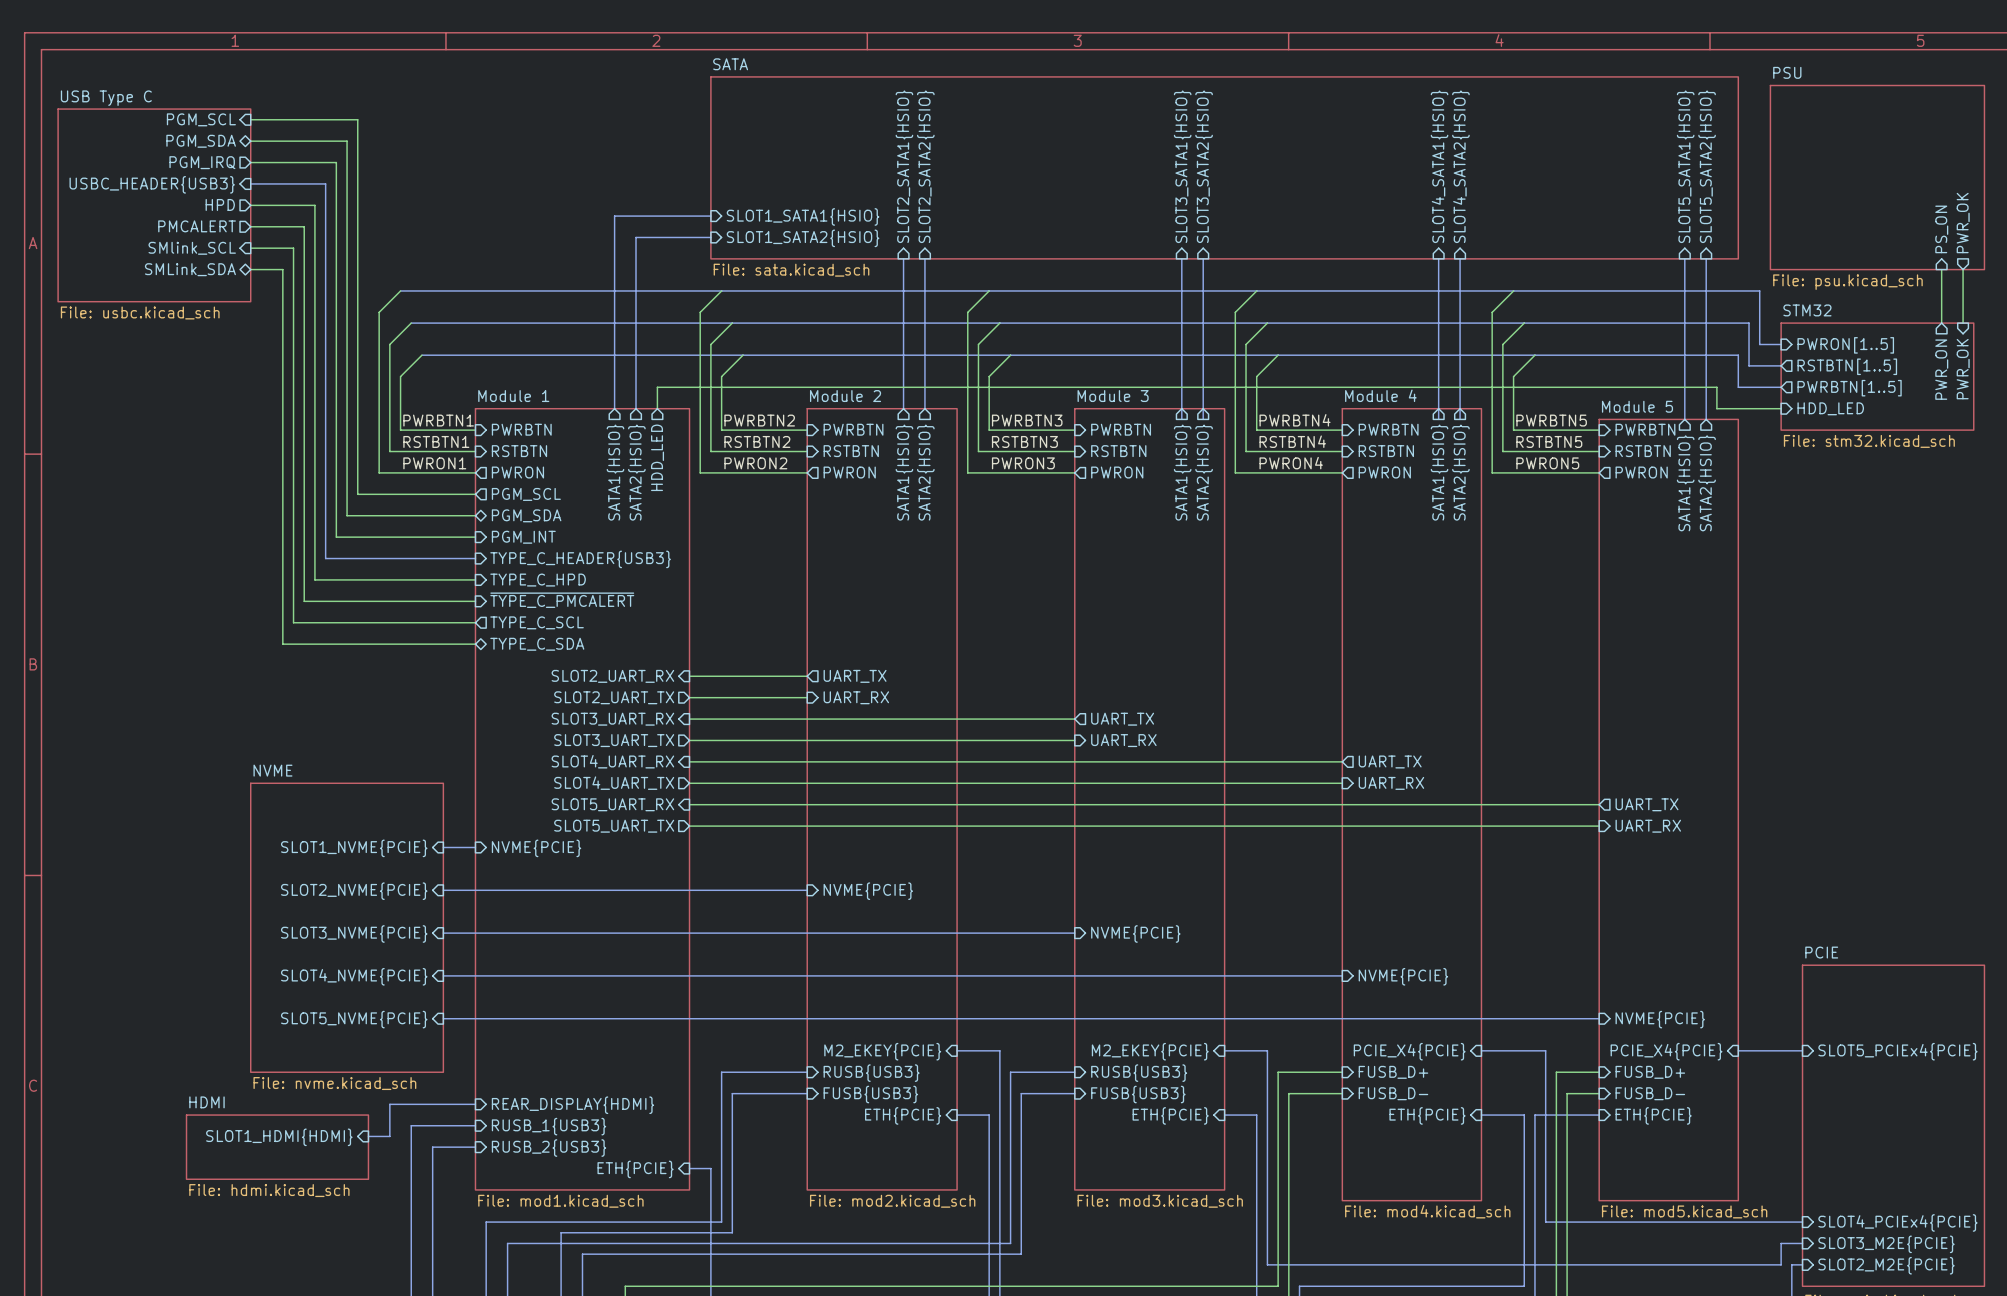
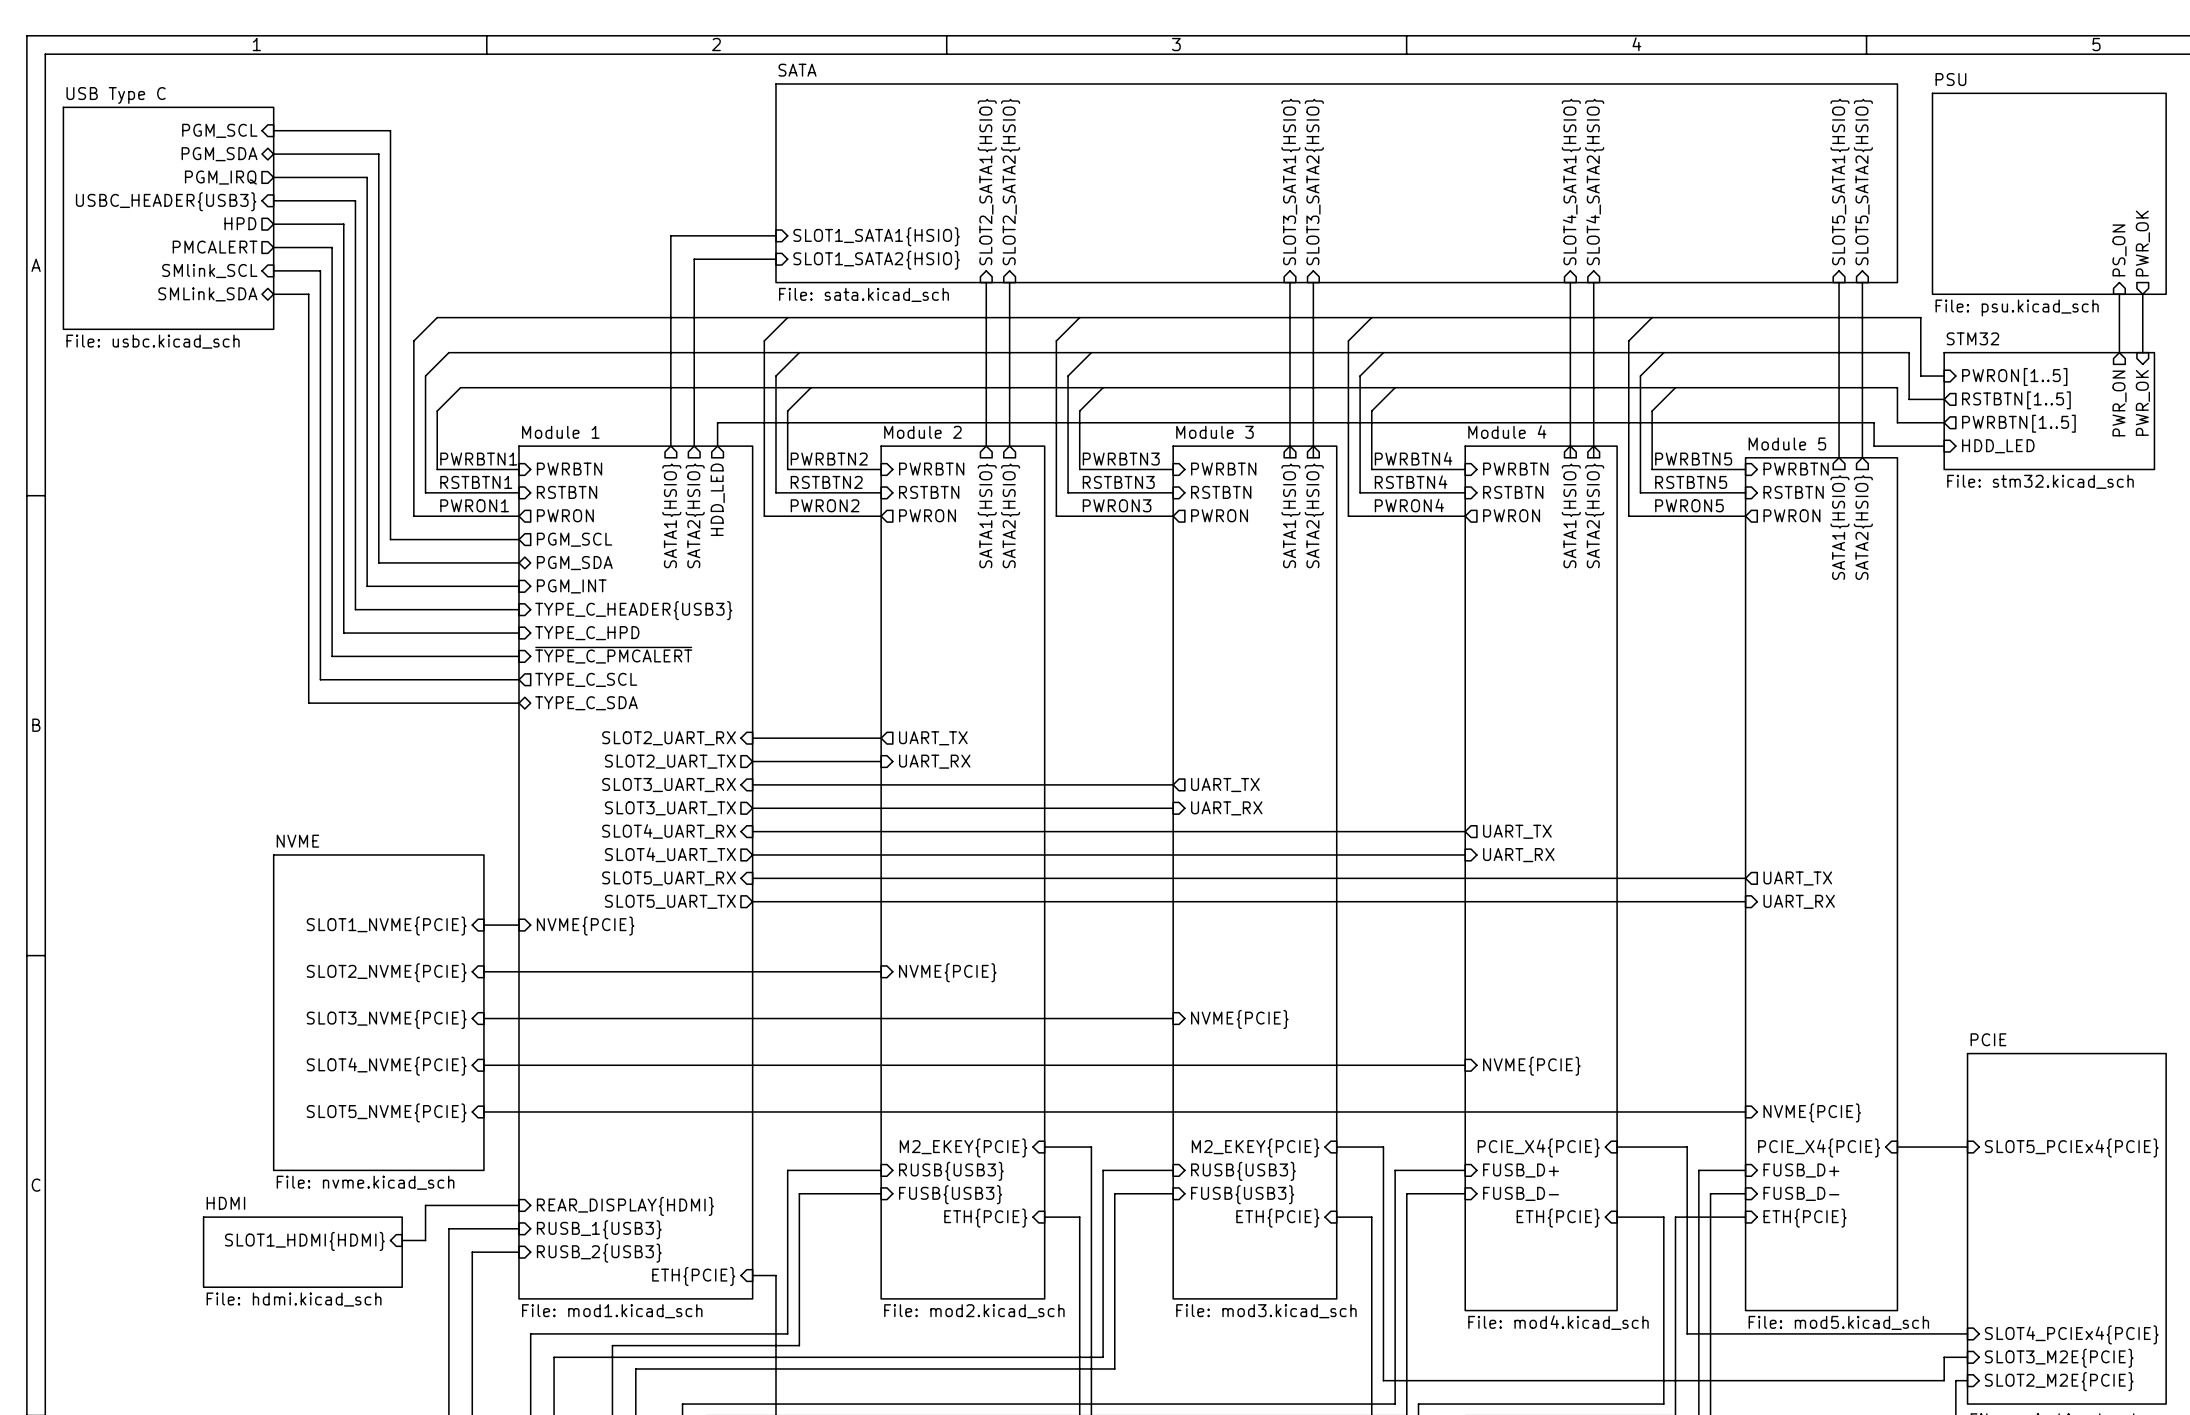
sheet USB Type C shape: [57, 108, 252, 303] -> [62, 106, 275, 331]

